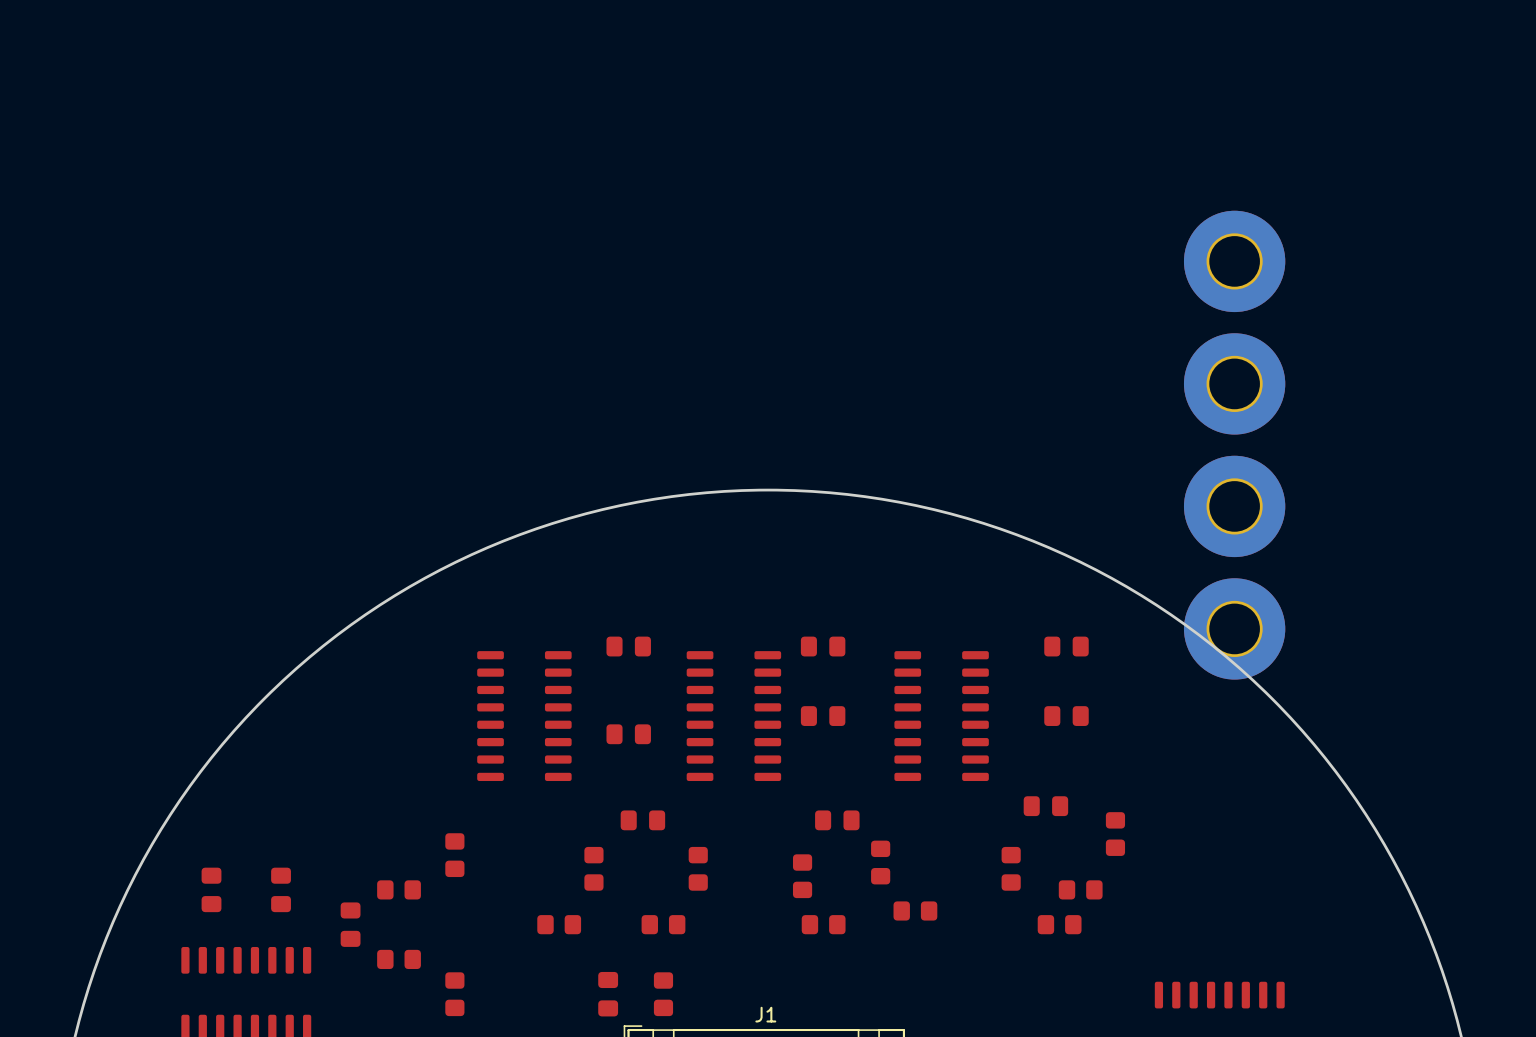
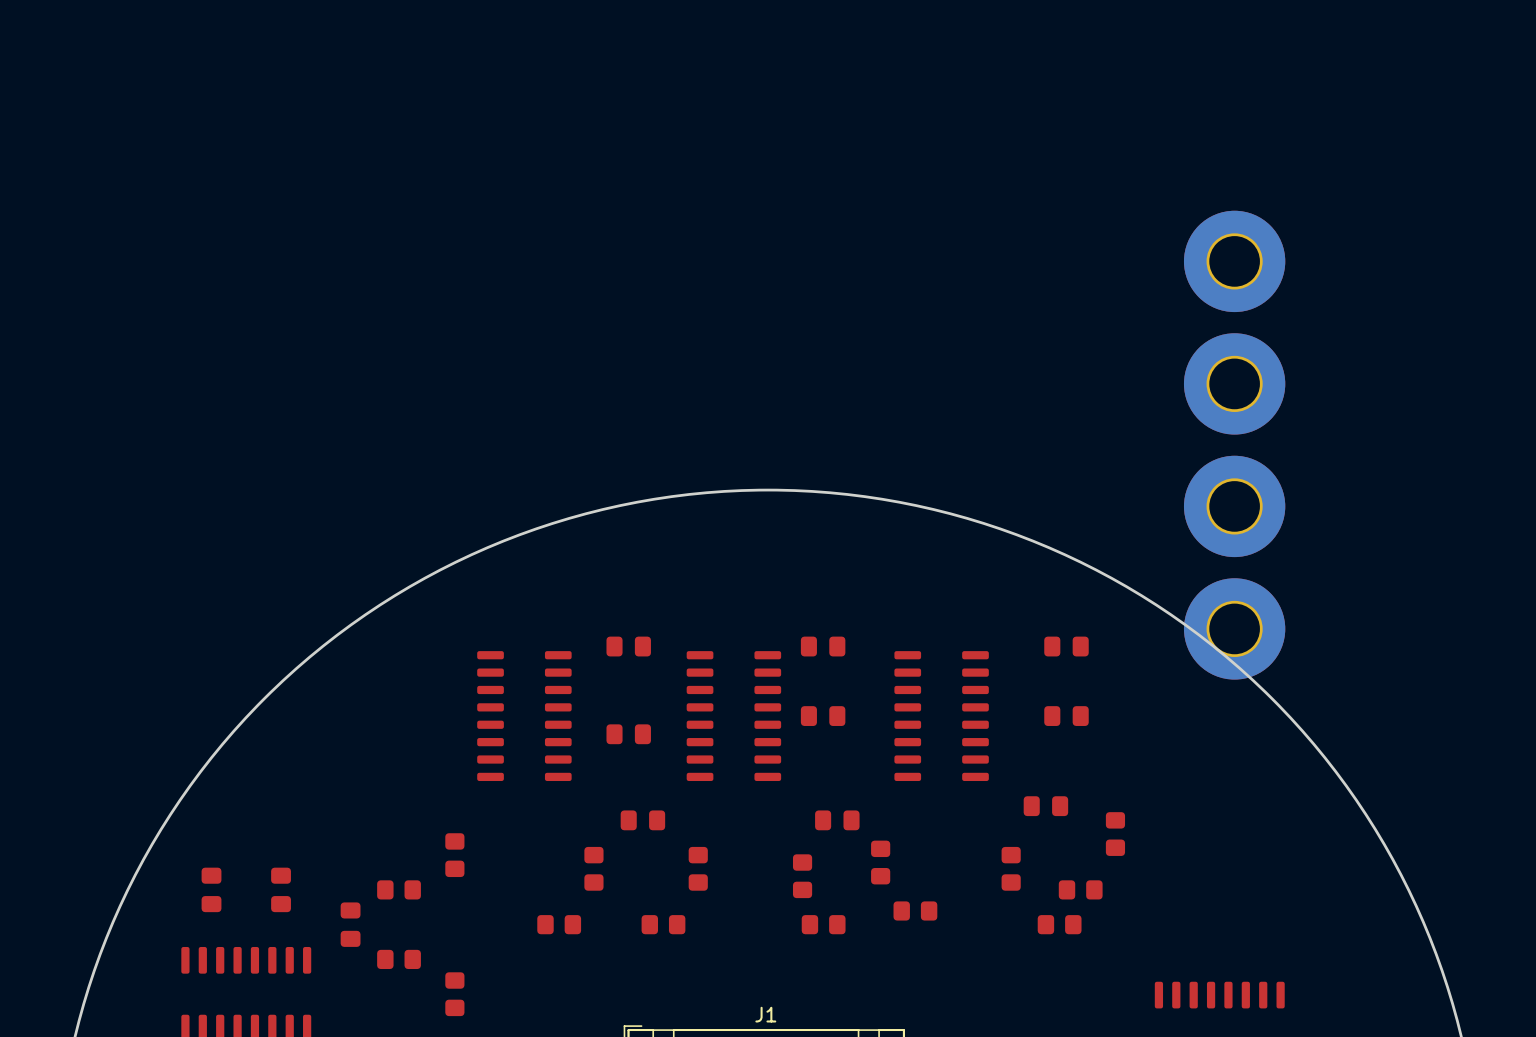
part: (608, 994) -> none
part: (663, 994) -> none

